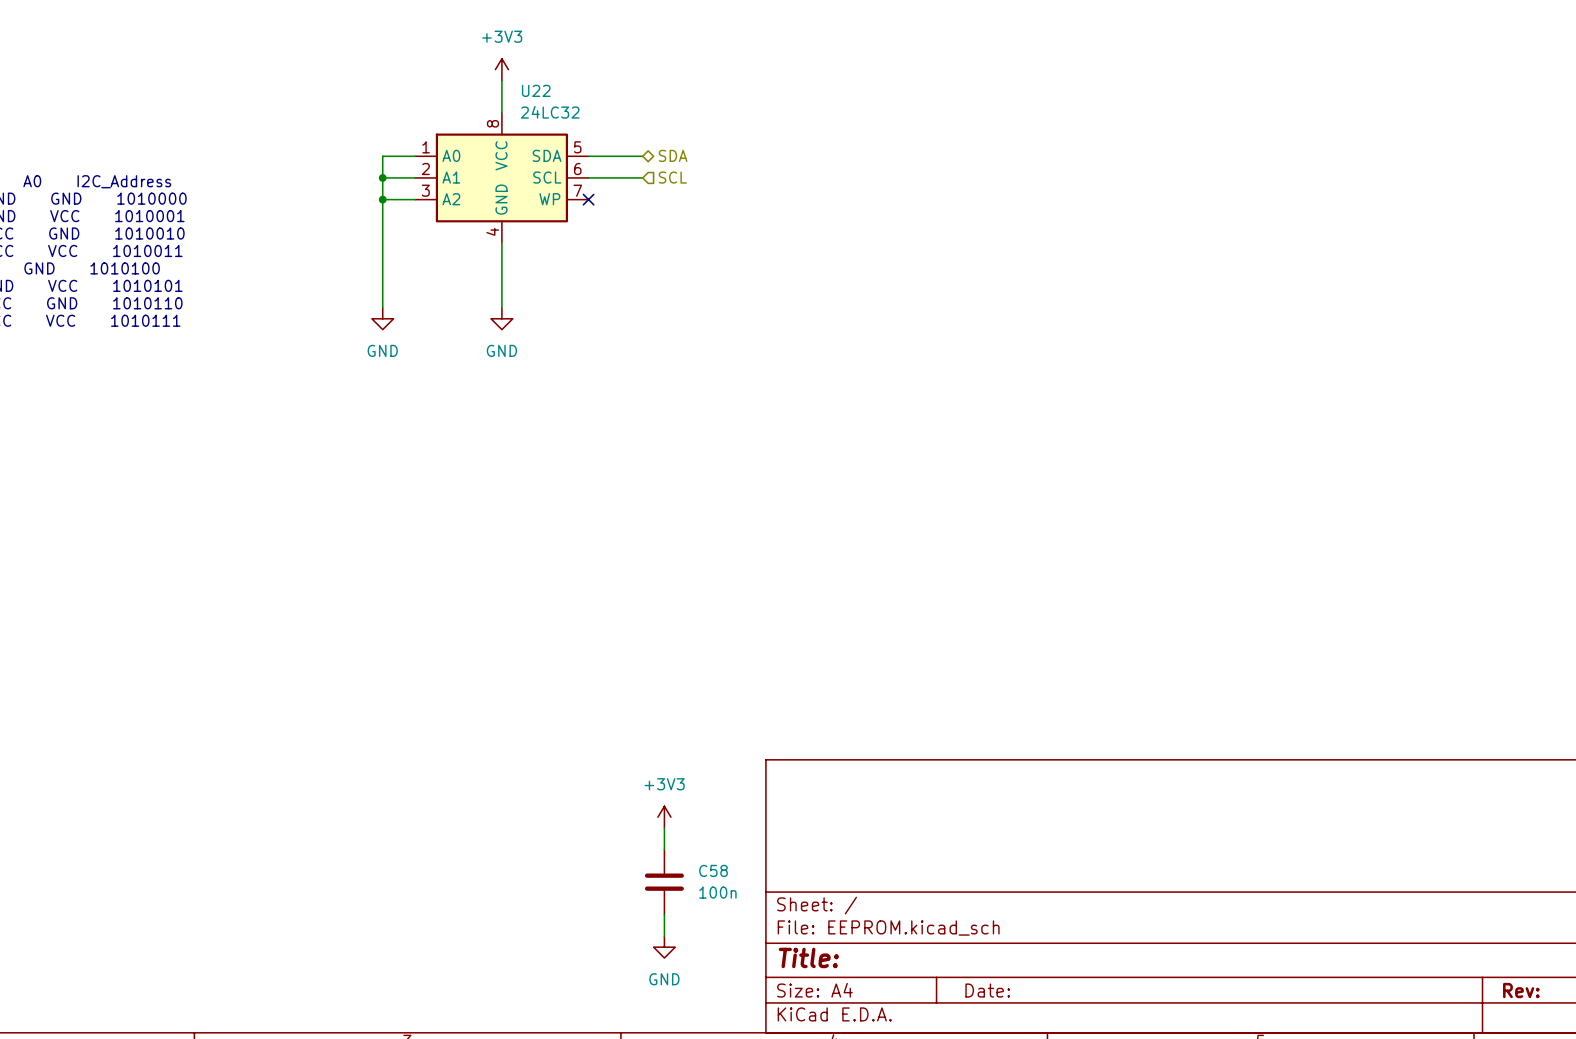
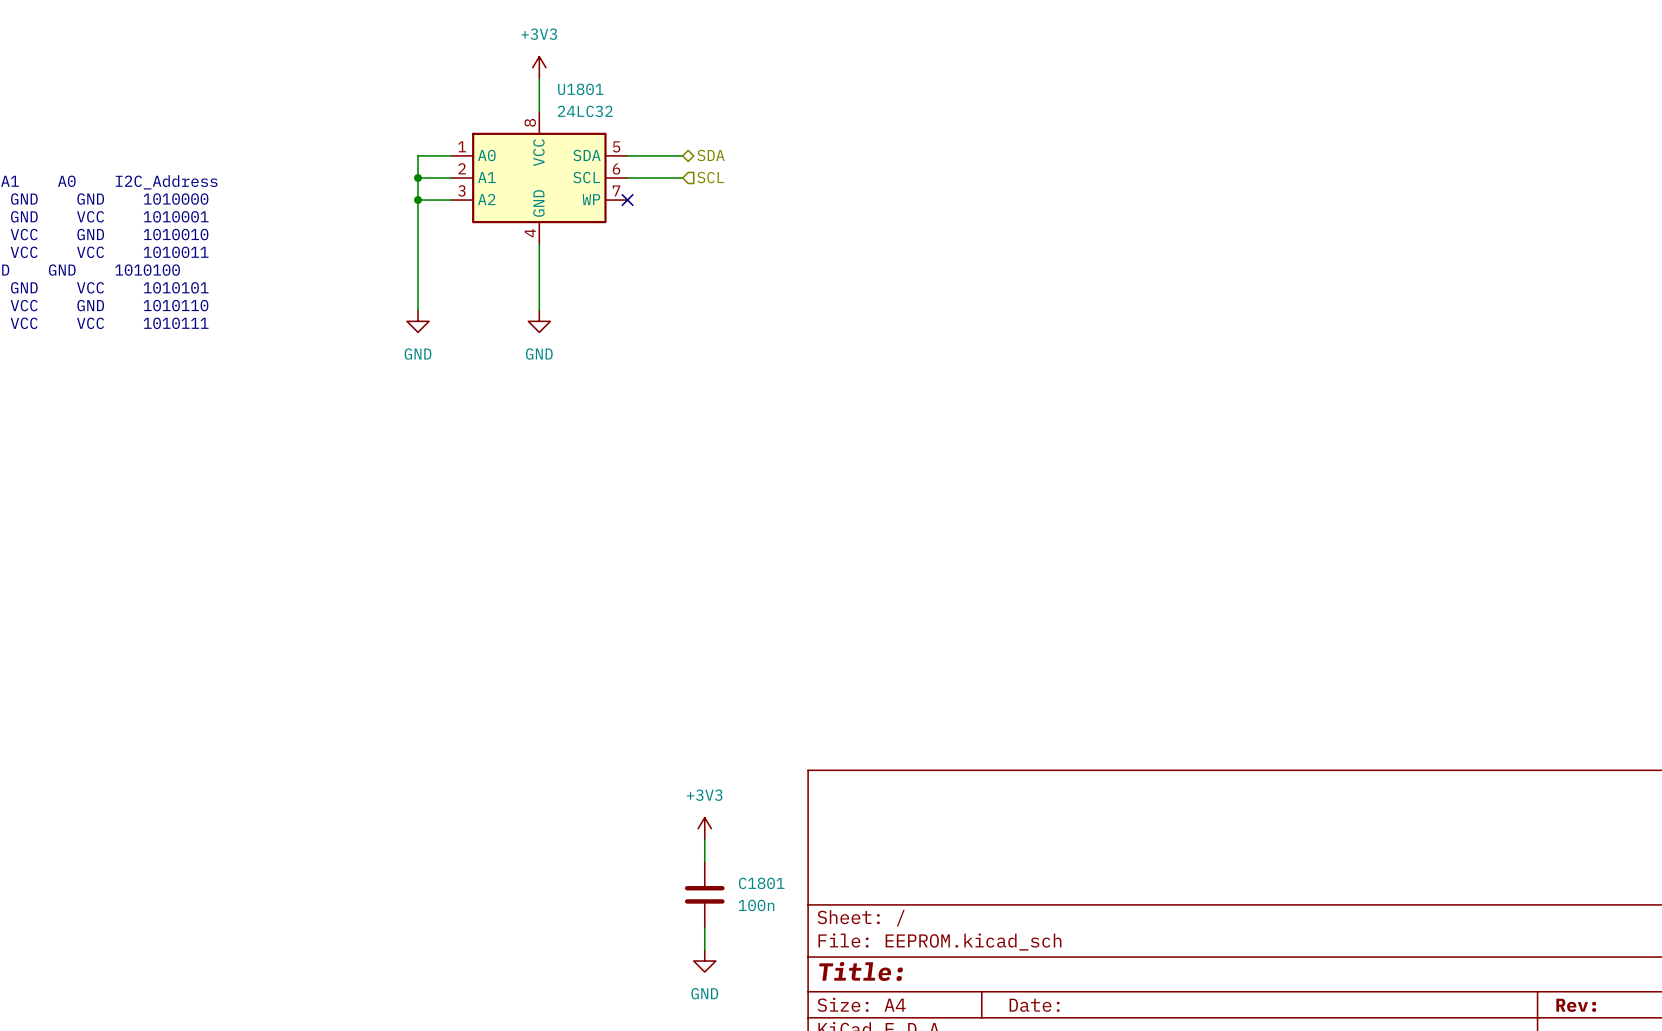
U22 name: U22 (536, 90) -> U1801 (580, 89)
C58 name: C58 (713, 870) -> C1801 (761, 883)

